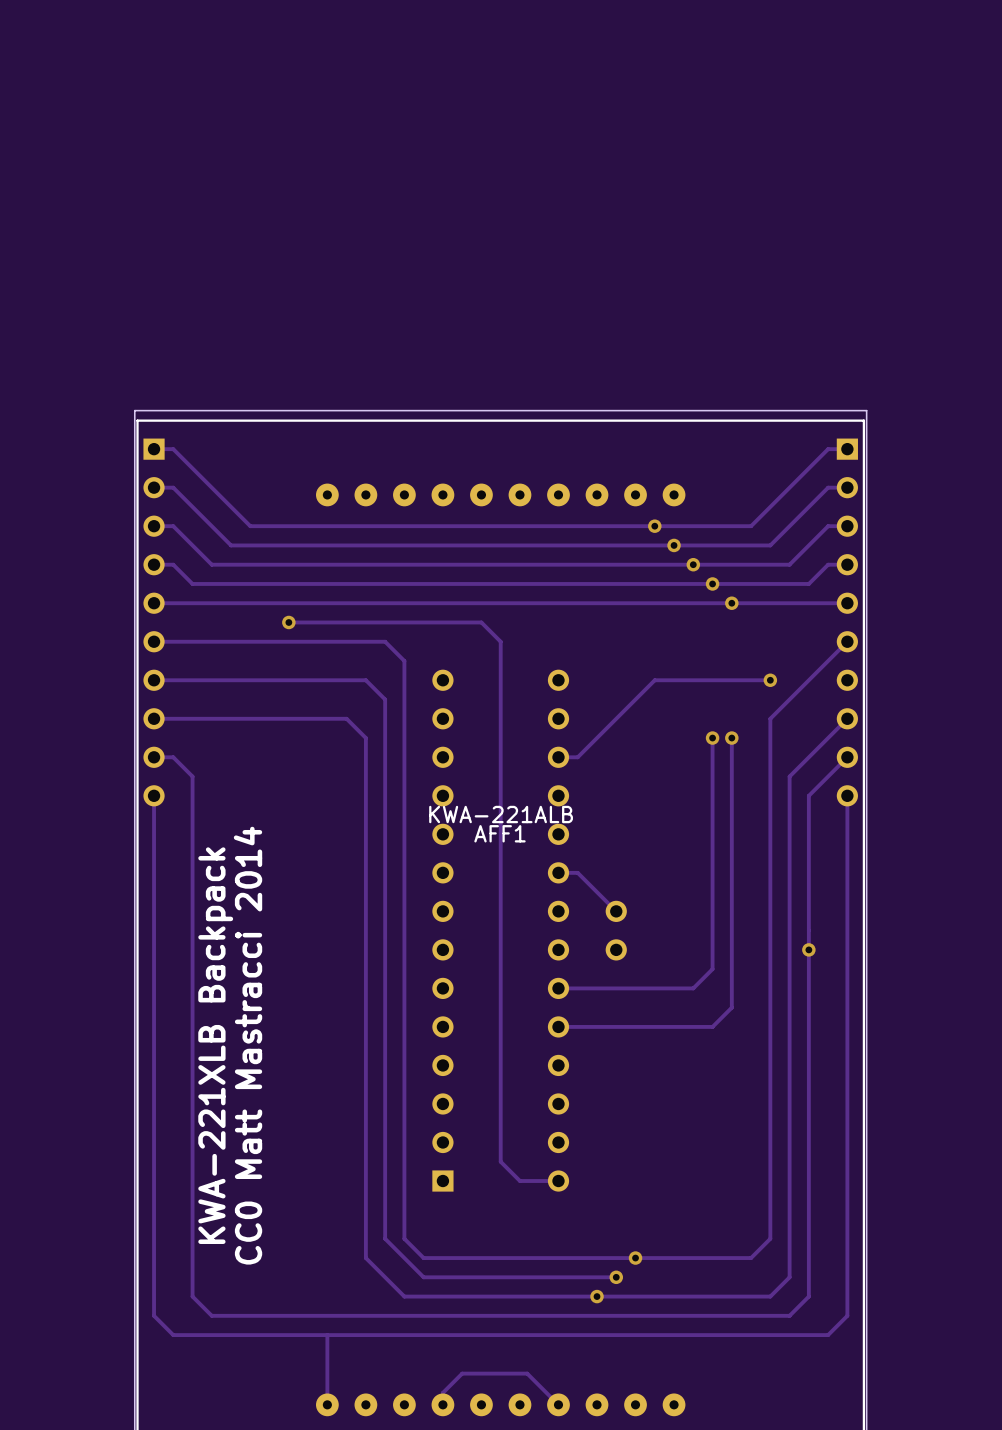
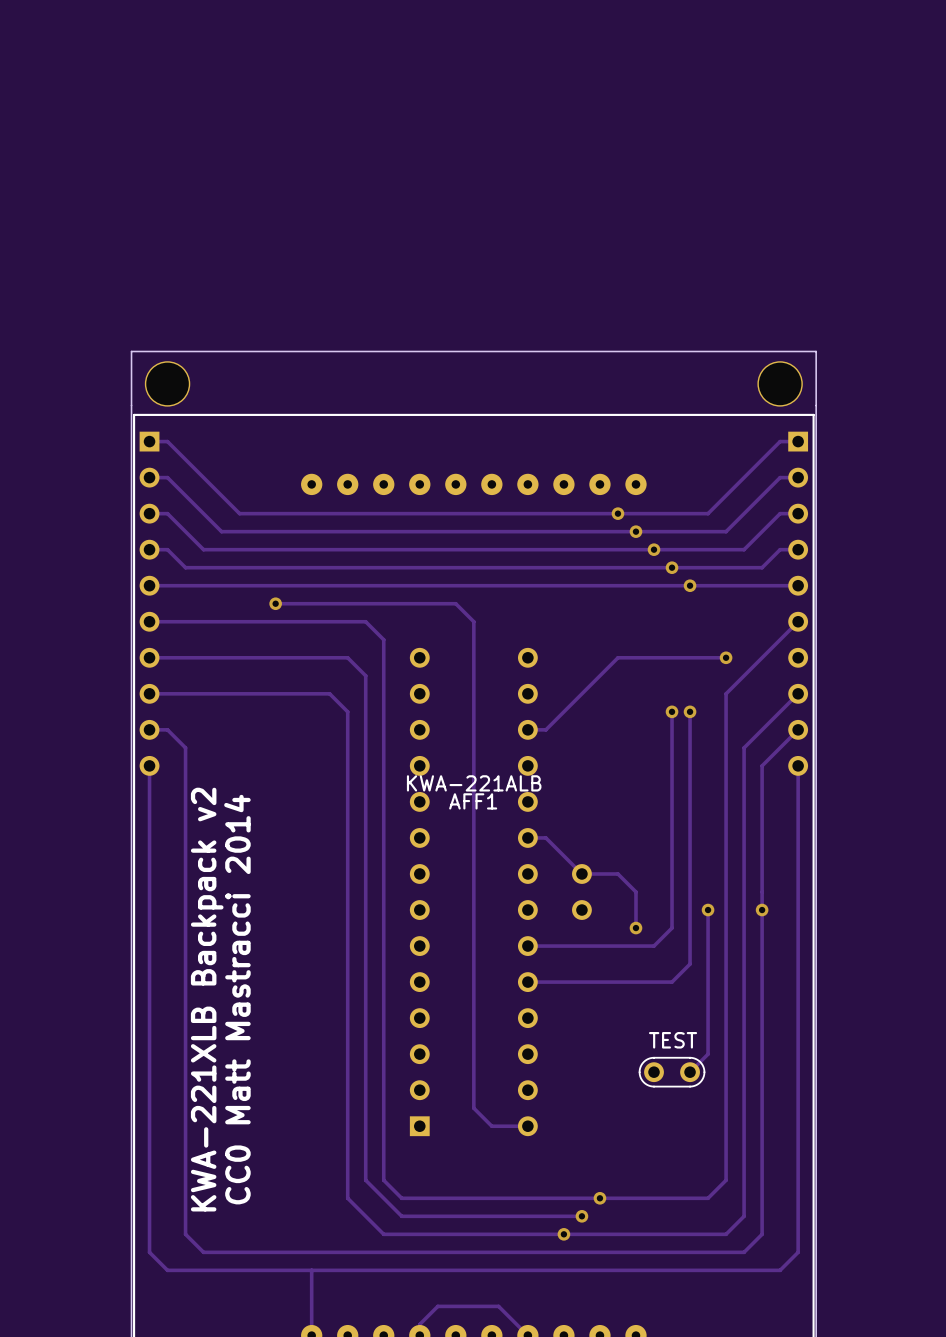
part: none -> (167, 383)
part: none -> (780, 383)
board edge: (134, 410) (866, 410) -> (131, 405) (131, 351) (816, 351) (816, 405)
track: none -> (581, 873) (617, 873) (635, 892) (635, 928)
track: none -> (708, 910) (708, 1054) (690, 1072)
via: none -> (708, 910)
via: none -> (635, 928)
text: KWA-221XLB Backpack (215, 1045) -> KWA-221XLB Backpack v2 (207, 999)
part: none -> TEST (672, 1072)

